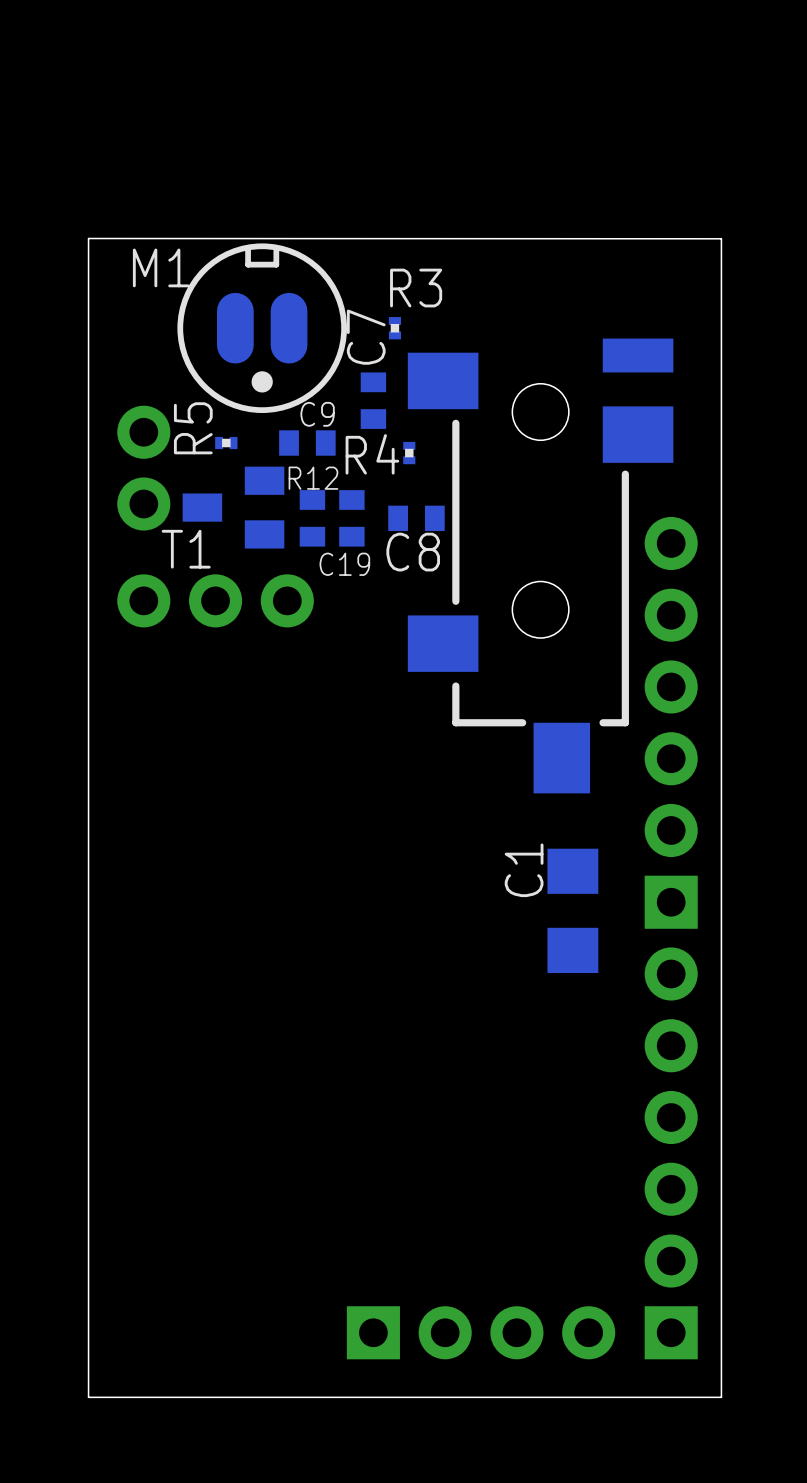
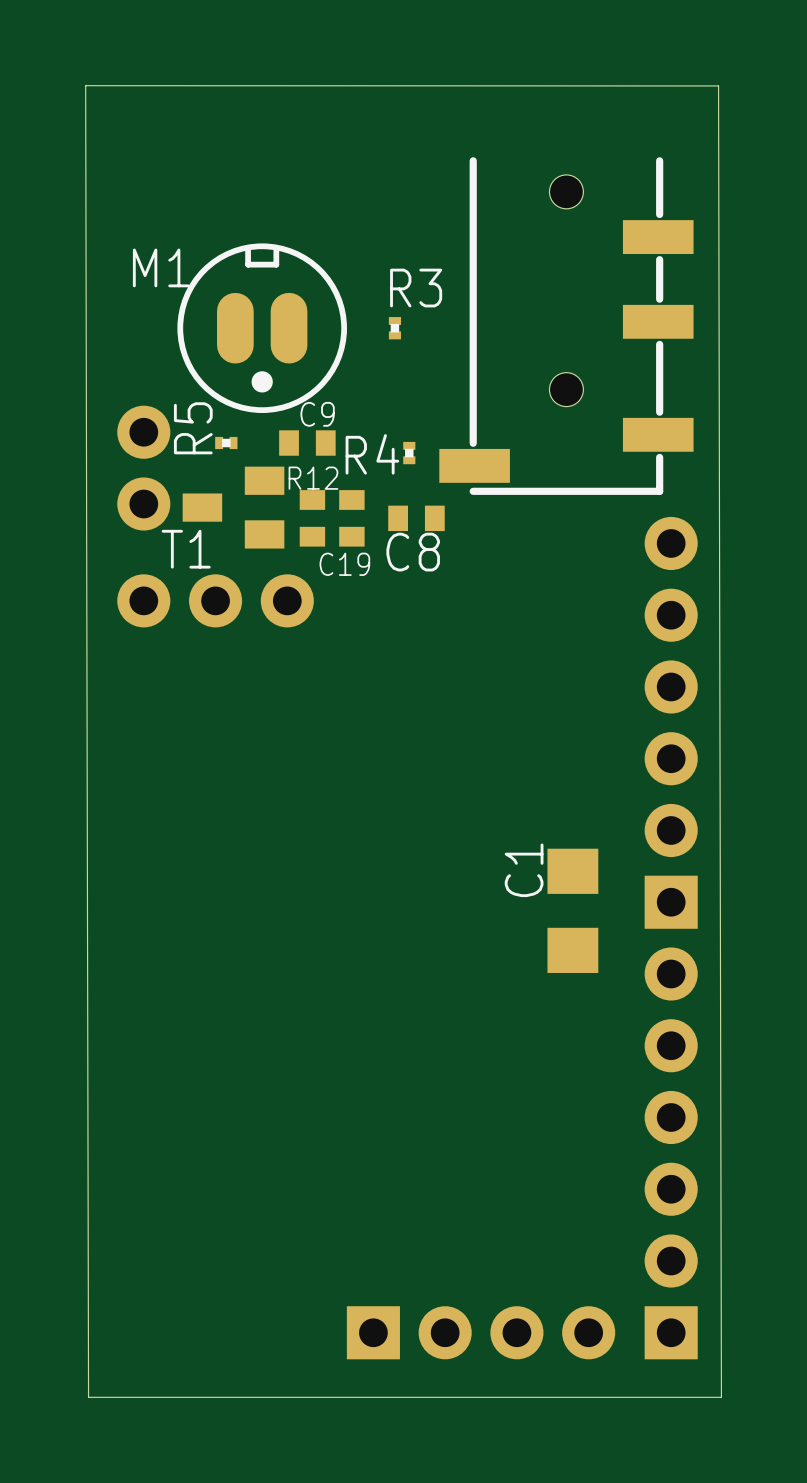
part: none -> (566, 326)
C7: (373, 400) -> none
part: (540, 565) -> none
board edge: (721, 1397) (721, 238) (88, 238) (88, 1397) -> (721, 1397) (718, 85) (85, 85) (88, 1397)

